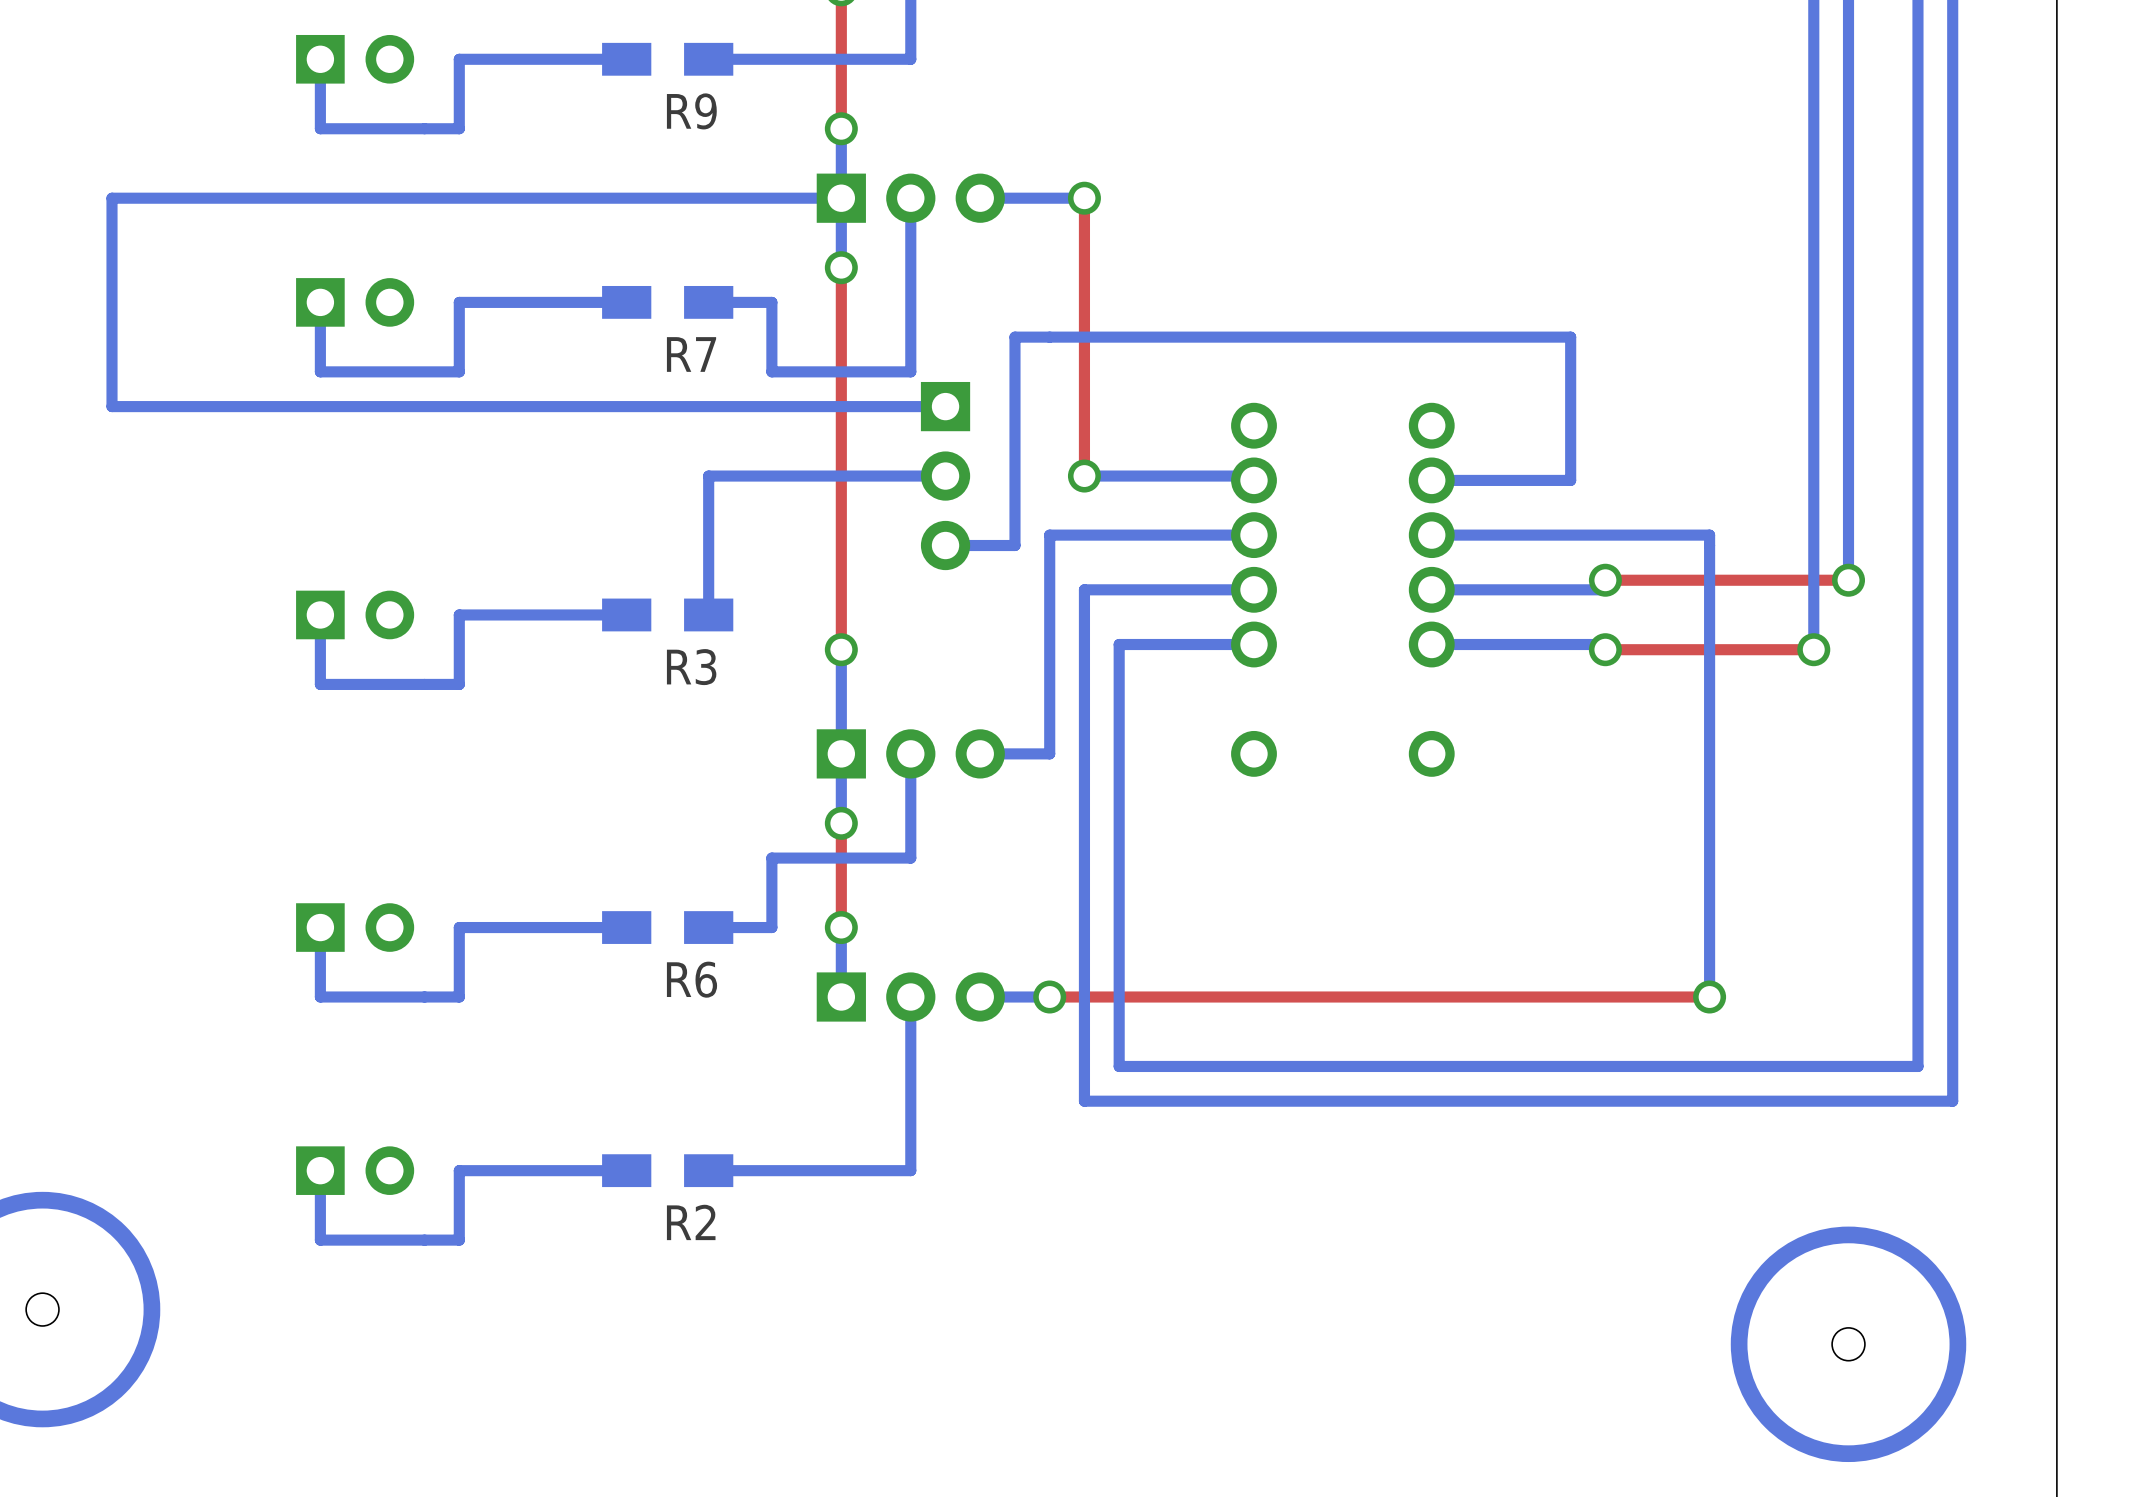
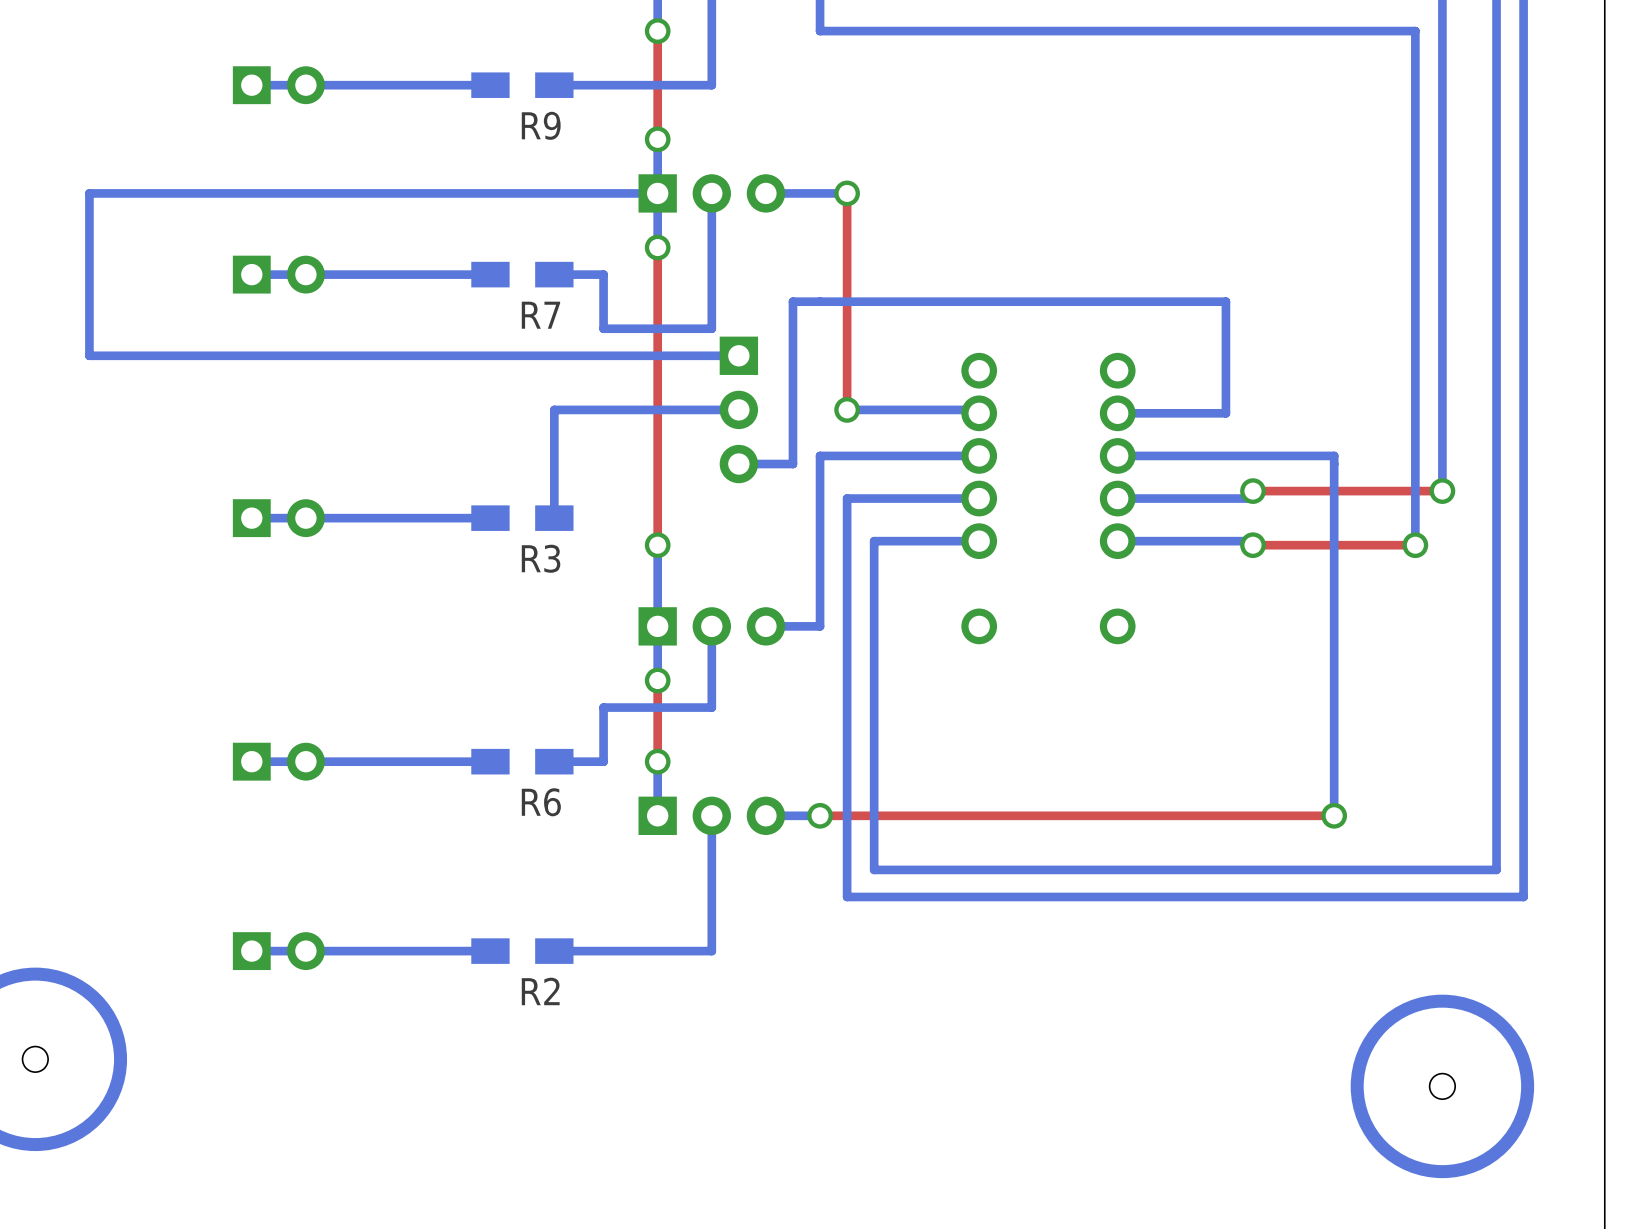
bottom track: (459, 59) (459, 128) (320, 128) (320, 59) -> (360, 85) (251, 85)
bottom track: (459, 302) (459, 371) (320, 371) (320, 302) -> (360, 274) (251, 274)
bottom track: (459, 614) (459, 684) (320, 684) (320, 614) -> (360, 518) (251, 518)
bottom track: (459, 927) (459, 997) (320, 997) (320, 927) -> (360, 761) (251, 761)
bottom track: (459, 1170) (459, 1240) (320, 1240) (320, 1170) -> (360, 951) (251, 951)

